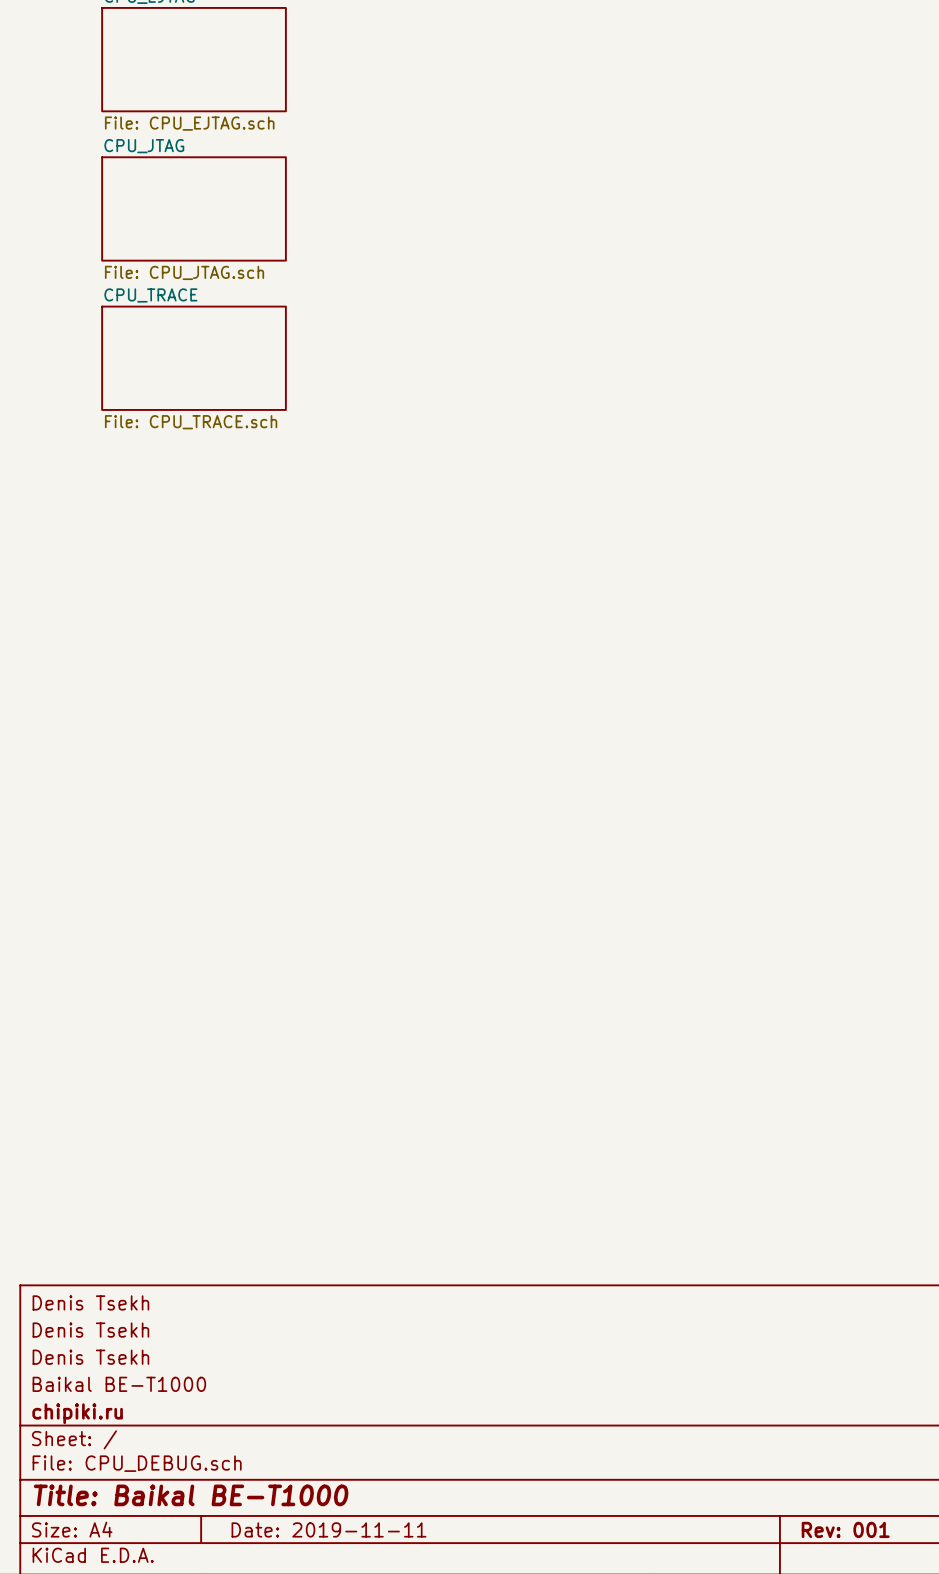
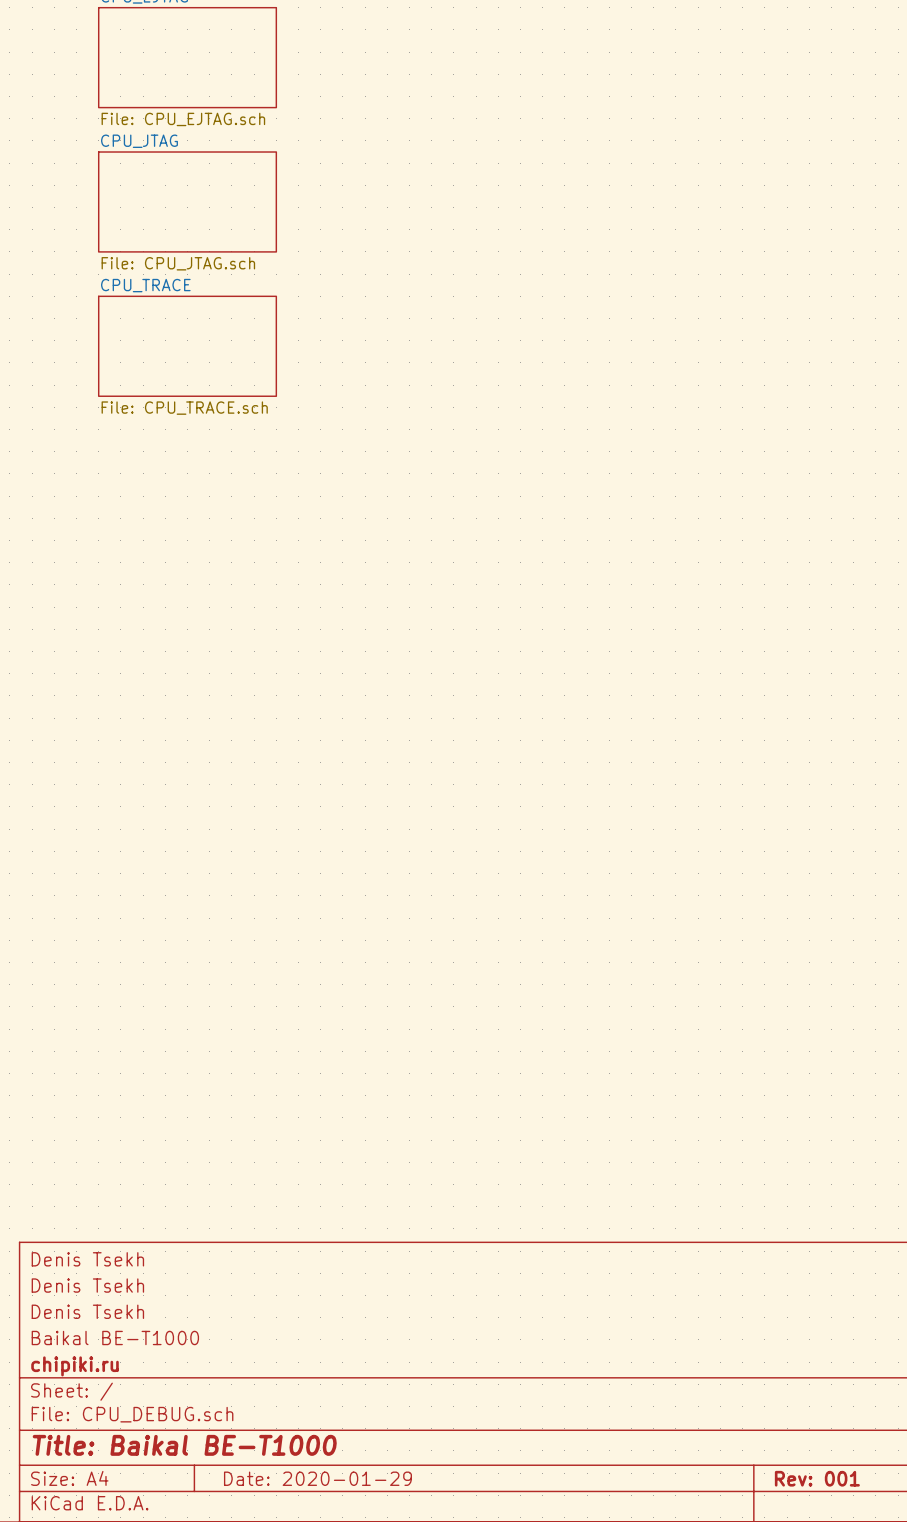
title block: Date: 2019-11-11 (328, 1529) -> Date: 2020-01-29 (317, 1478)

